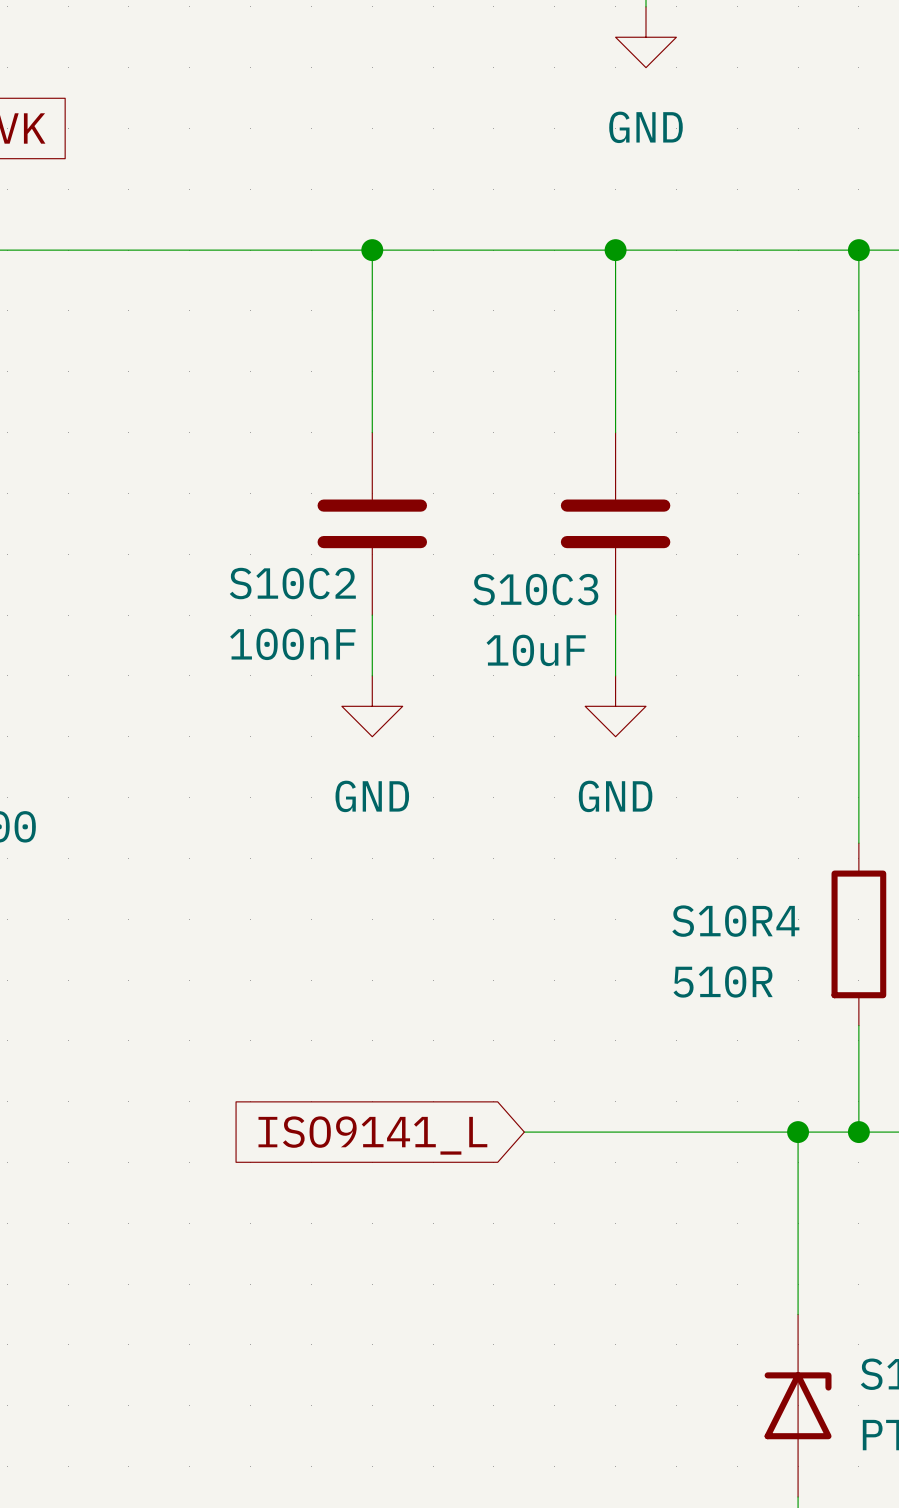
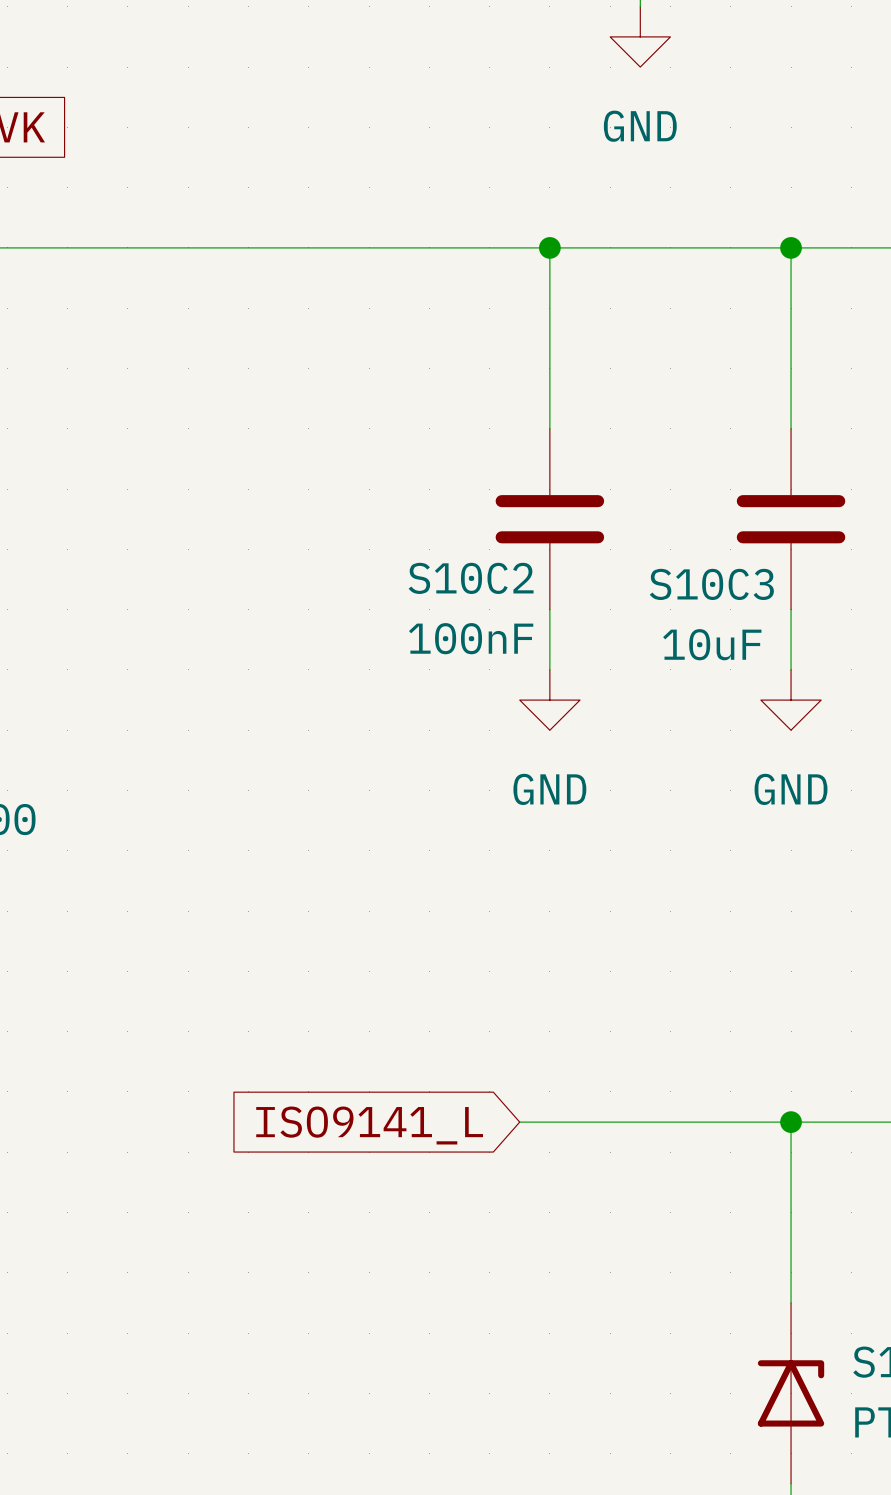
wire: (372, 250) (372, 432) -> (549, 247) (549, 428)
junction: (372, 250) -> none
wire: (615, 250) (615, 432) -> (791, 247) (791, 428)
junction position: (615, 250) -> (549, 247)
wire: (858, 250) (858, 843) -> none
junction position: (858, 250) -> (791, 247)
S10C2 position: (372, 523) -> (549, 519)
S10C3 position: (615, 523) -> (791, 519)
wire: (372, 615) (372, 675) -> (549, 609) (549, 669)
wire: (615, 615) (615, 675) -> (791, 609) (791, 669)
power symbol: GND (372, 706) -> none
power symbol position: GND (615, 706) -> GND (549, 700)
power symbol: none -> GND (791, 700)
S10R4: 510R (858, 934) -> none
wire: (858, 1025) (858, 1132) -> none
junction: (858, 1132) -> none

